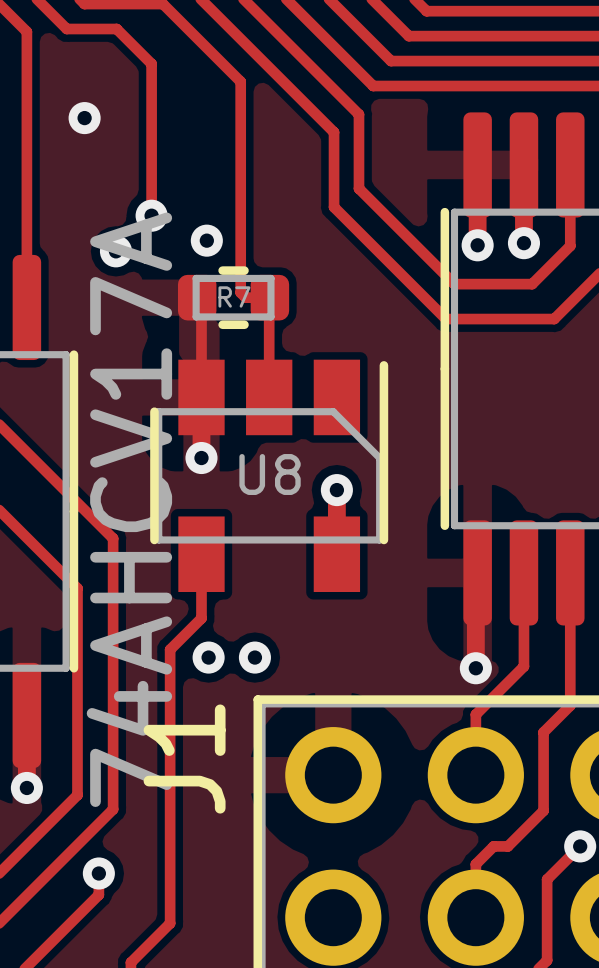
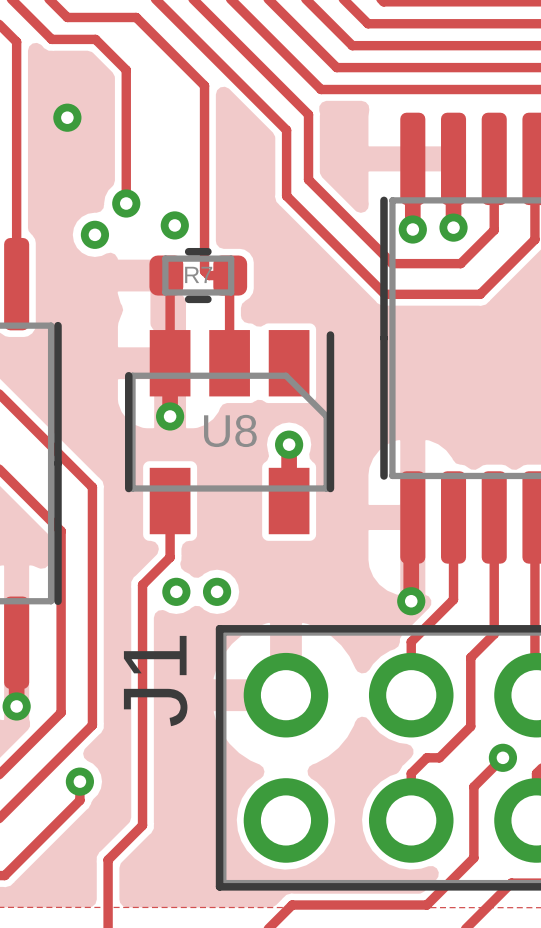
part value: 74AHCV17A (129, 509) -> none

